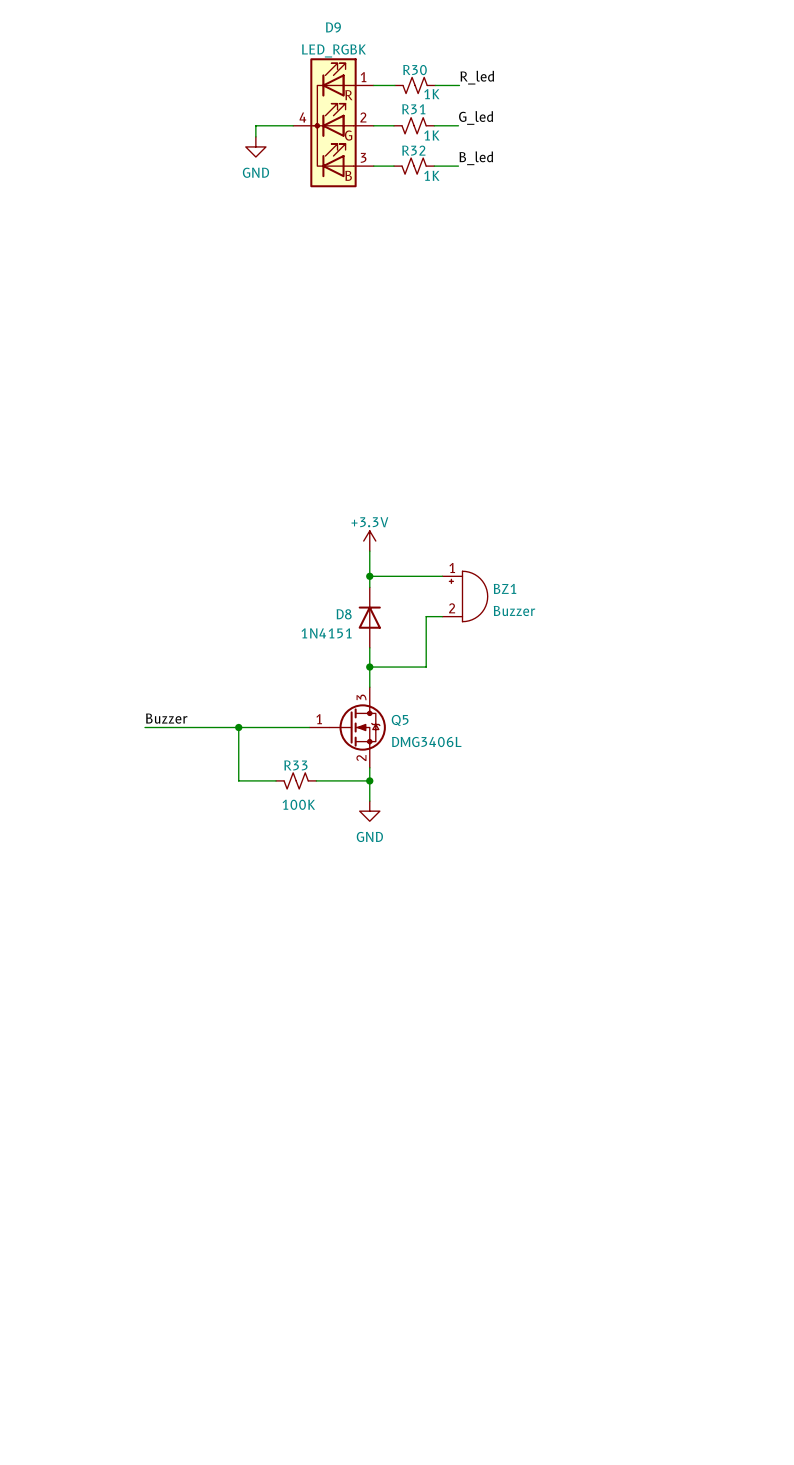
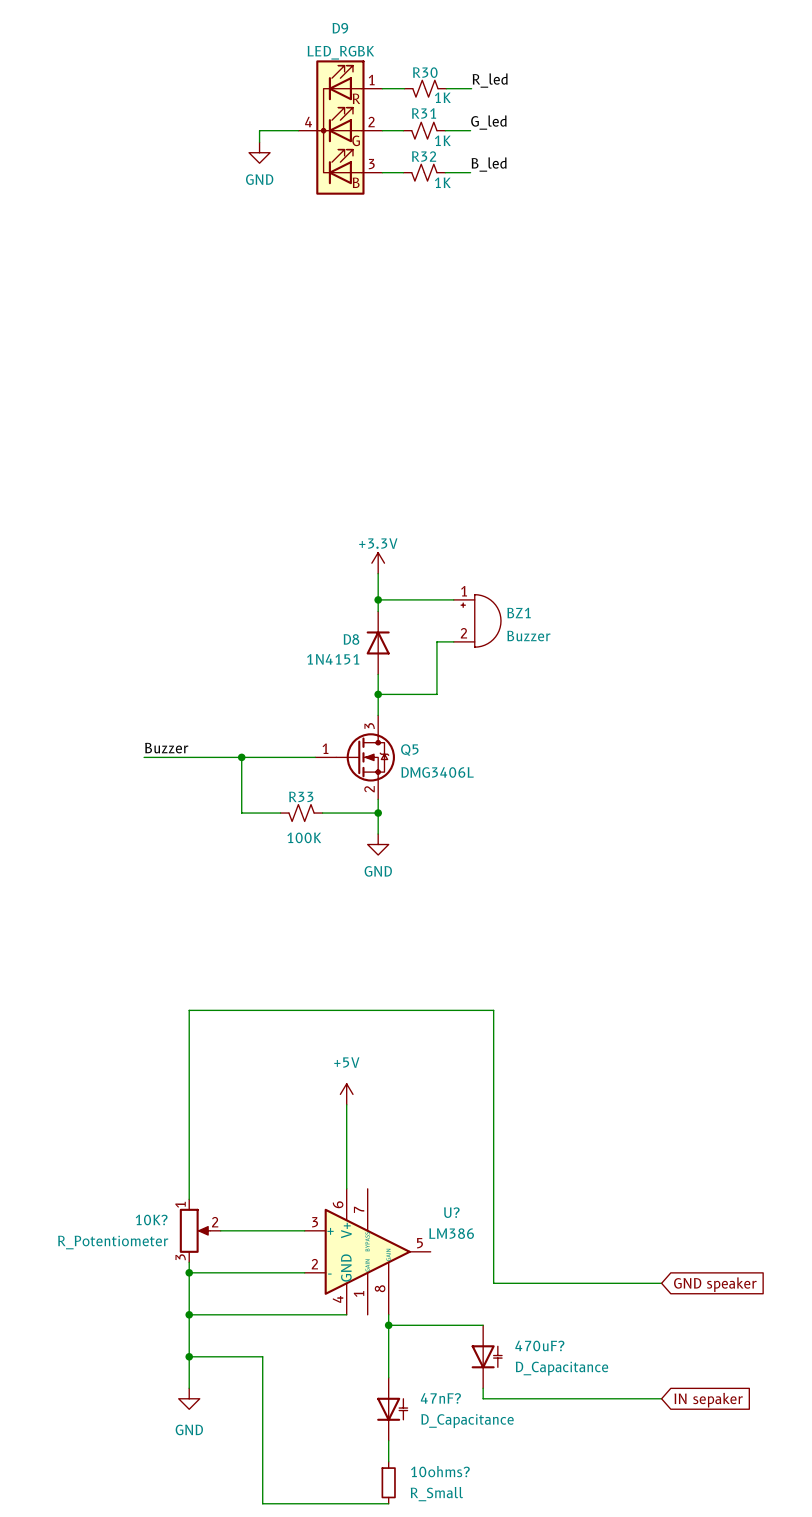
power symbol: none -> +5V (346, 1094)
wire: none -> (346, 1104) (346, 1188)
wire: none -> (189, 1199) (189, 1010) (493, 1010) (493, 1283) (661, 1283)
10K?: none -> R_Potentiometer (200, 1230)
wire: none -> (220, 1230) (304, 1230)
U?: none -> LM386 (367, 1251)
wire: none -> (189, 1262) (189, 1388)
wire: none -> (189, 1272) (304, 1272)
junction: none -> (189, 1272)
global label: none -> GND speaker (715, 1284)
wire: none -> (189, 1314) (346, 1314)
junction: none -> (189, 1314)
wire: none -> (388, 1314) (388, 1377)
wire: none -> (388, 1325) (483, 1325)
junction: none -> (388, 1325)
wire: none -> (189, 1356) (262, 1356) (262, 1503) (388, 1503)
junction: none -> (189, 1356)
470uF?: none -> D_Capacitance (486, 1356)
wire: none -> (483, 1388) (483, 1398) (661, 1398)
power symbol: none -> GND (189, 1398)
global label: none -> IN sepaker (708, 1400)
47nF?: none -> D_Capacitance (392, 1409)
wire: none -> (388, 1440) (388, 1461)
10ohms?: none -> R_Small (388, 1482)

